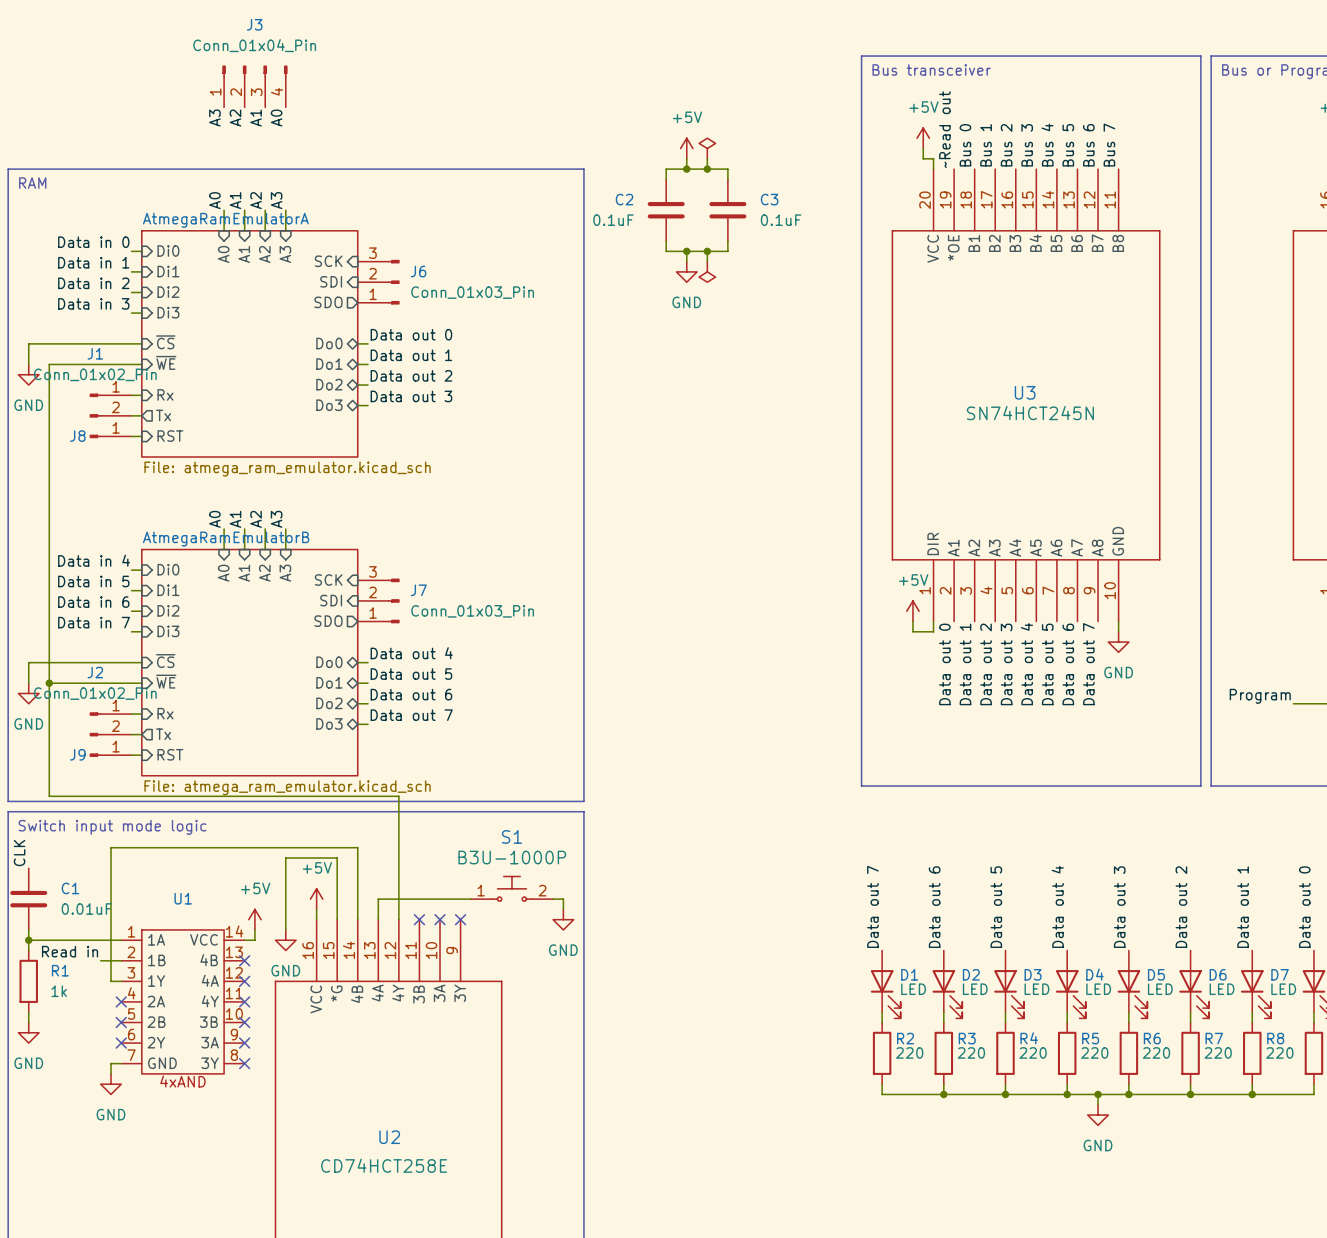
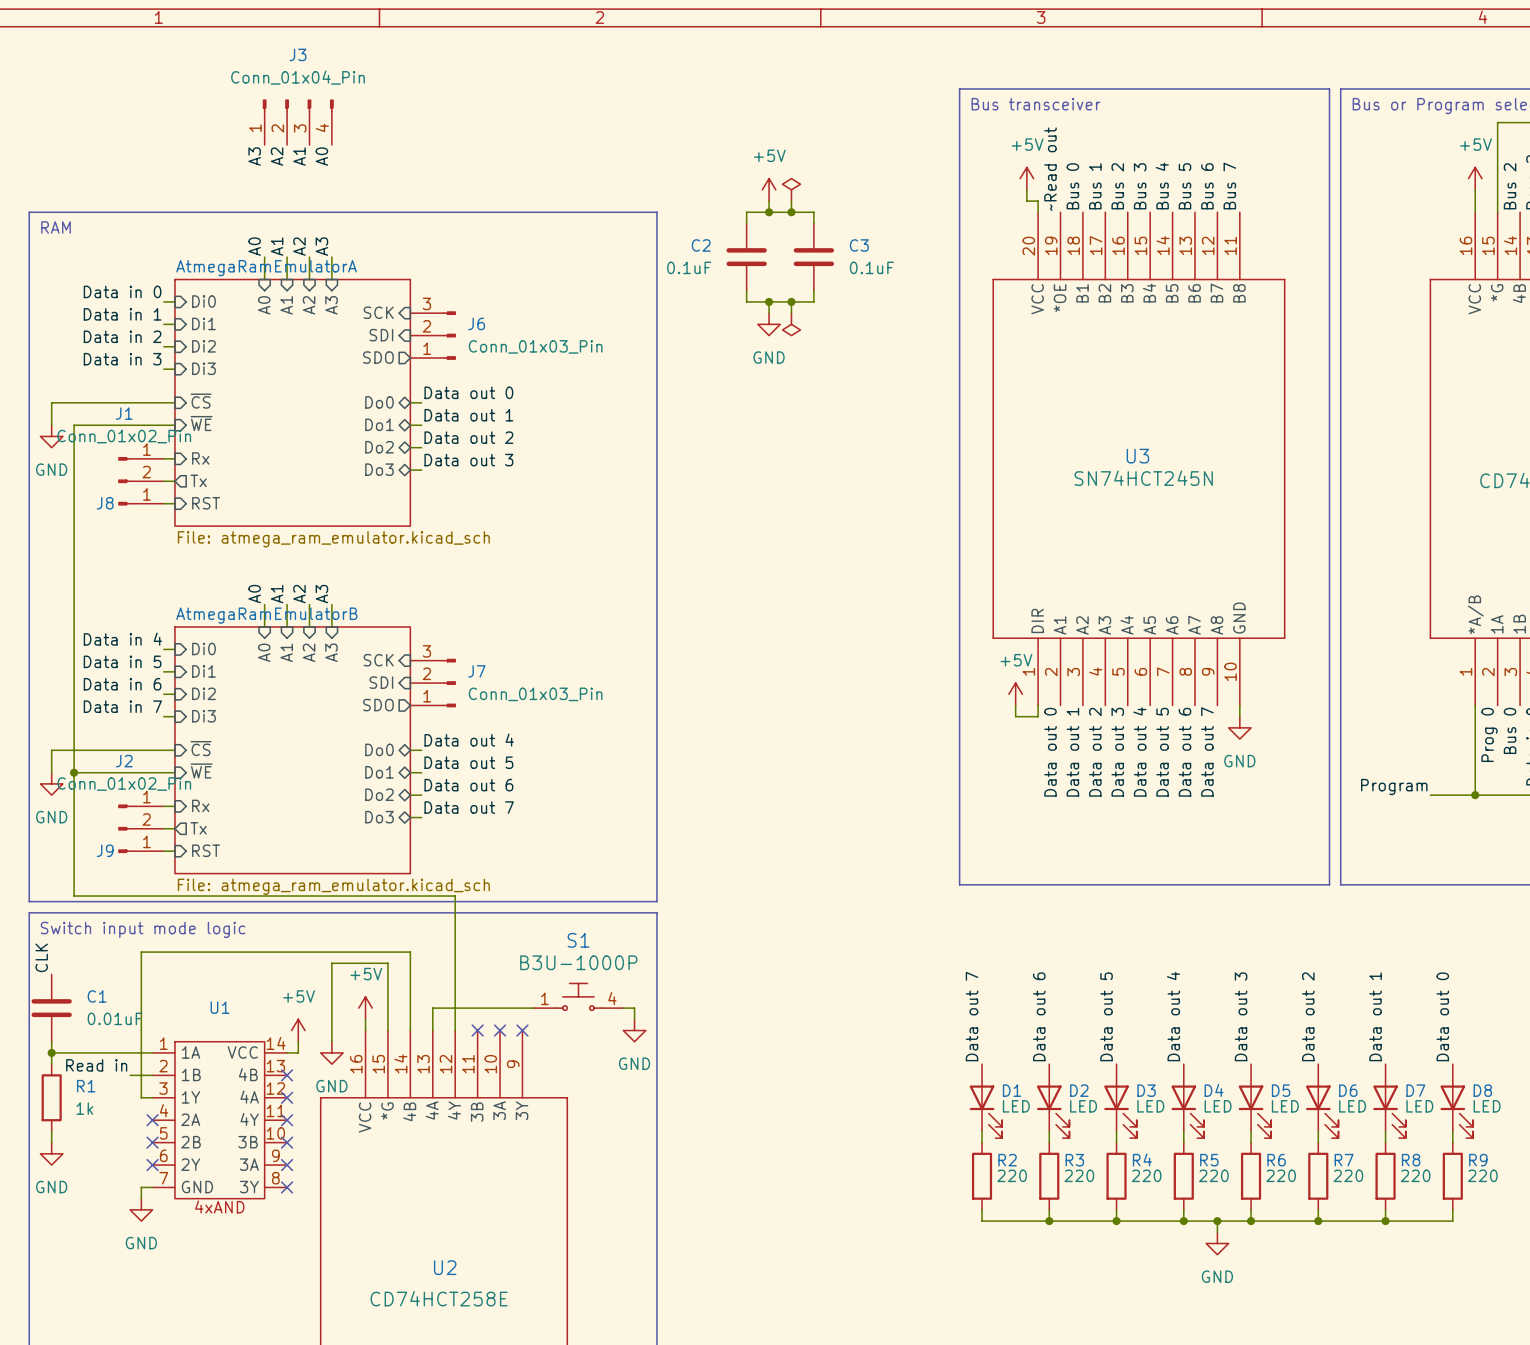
S1 pin number: 2 (542, 890) -> 4 (612, 998)

